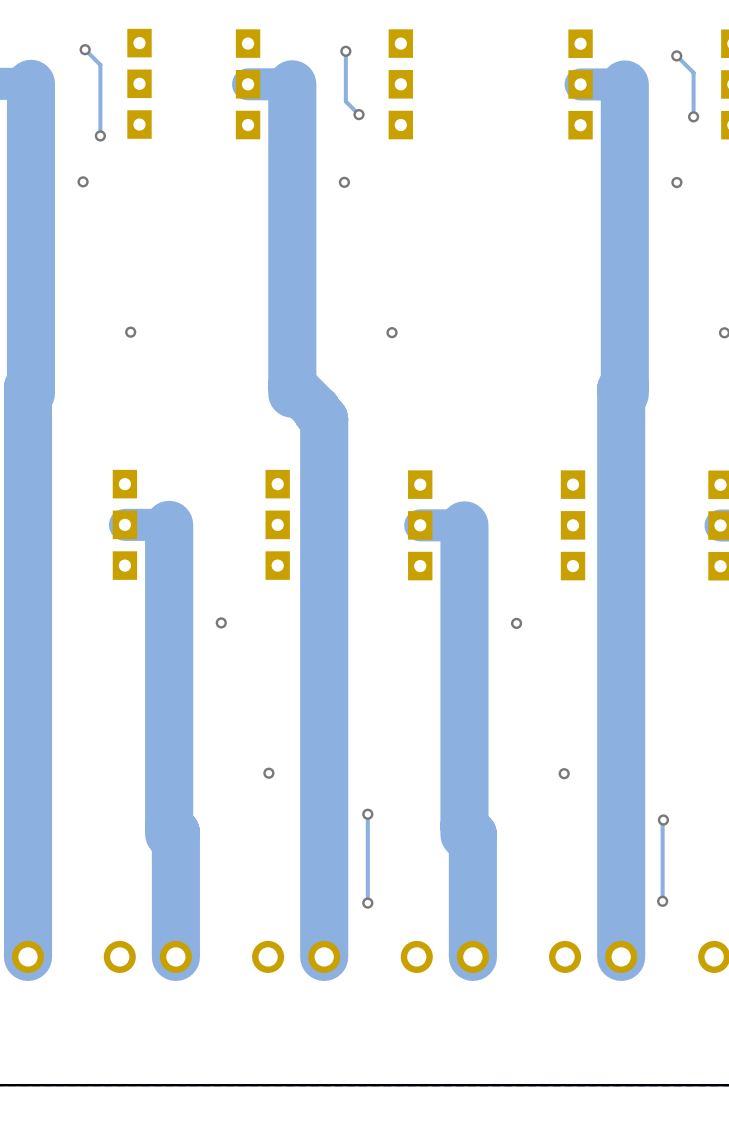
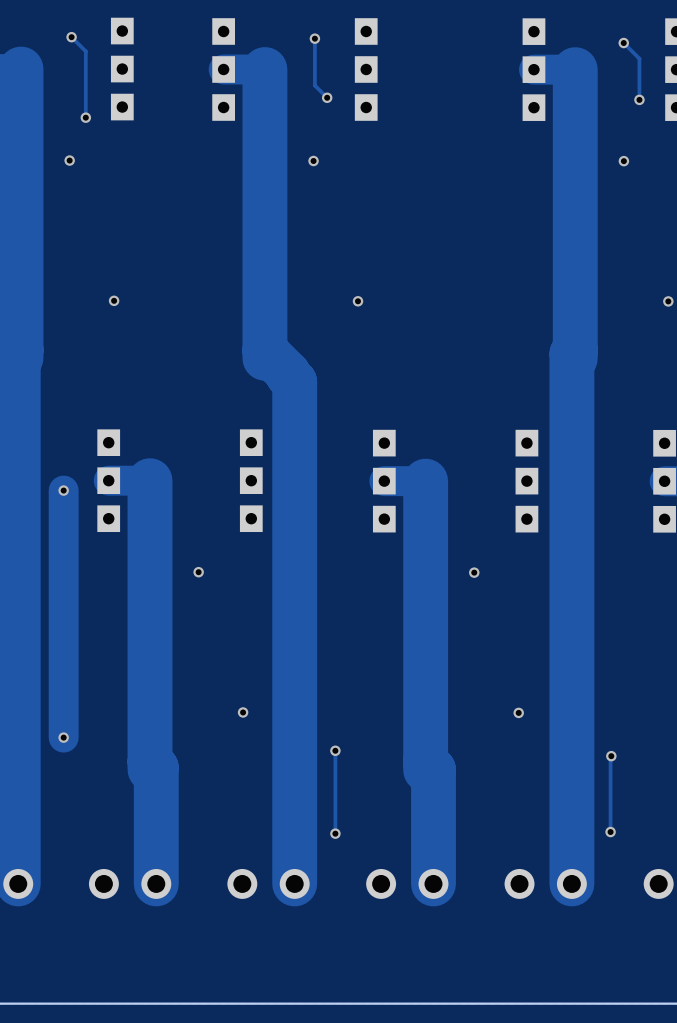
track: none -> (63, 490) (63, 737)
via: none -> (63, 490)
via: none -> (63, 737)

